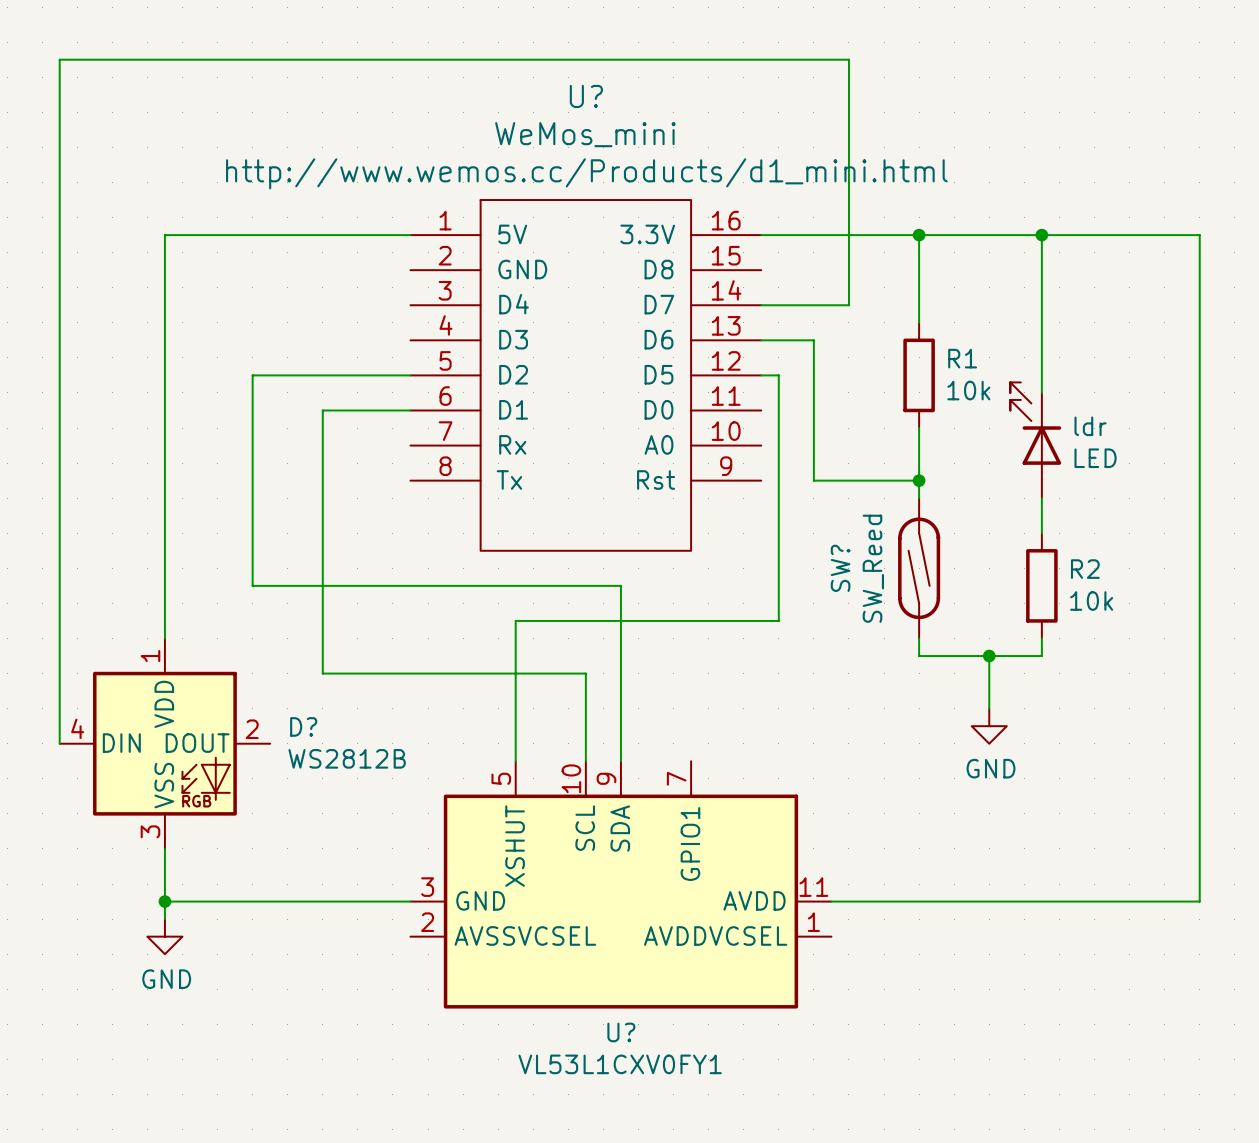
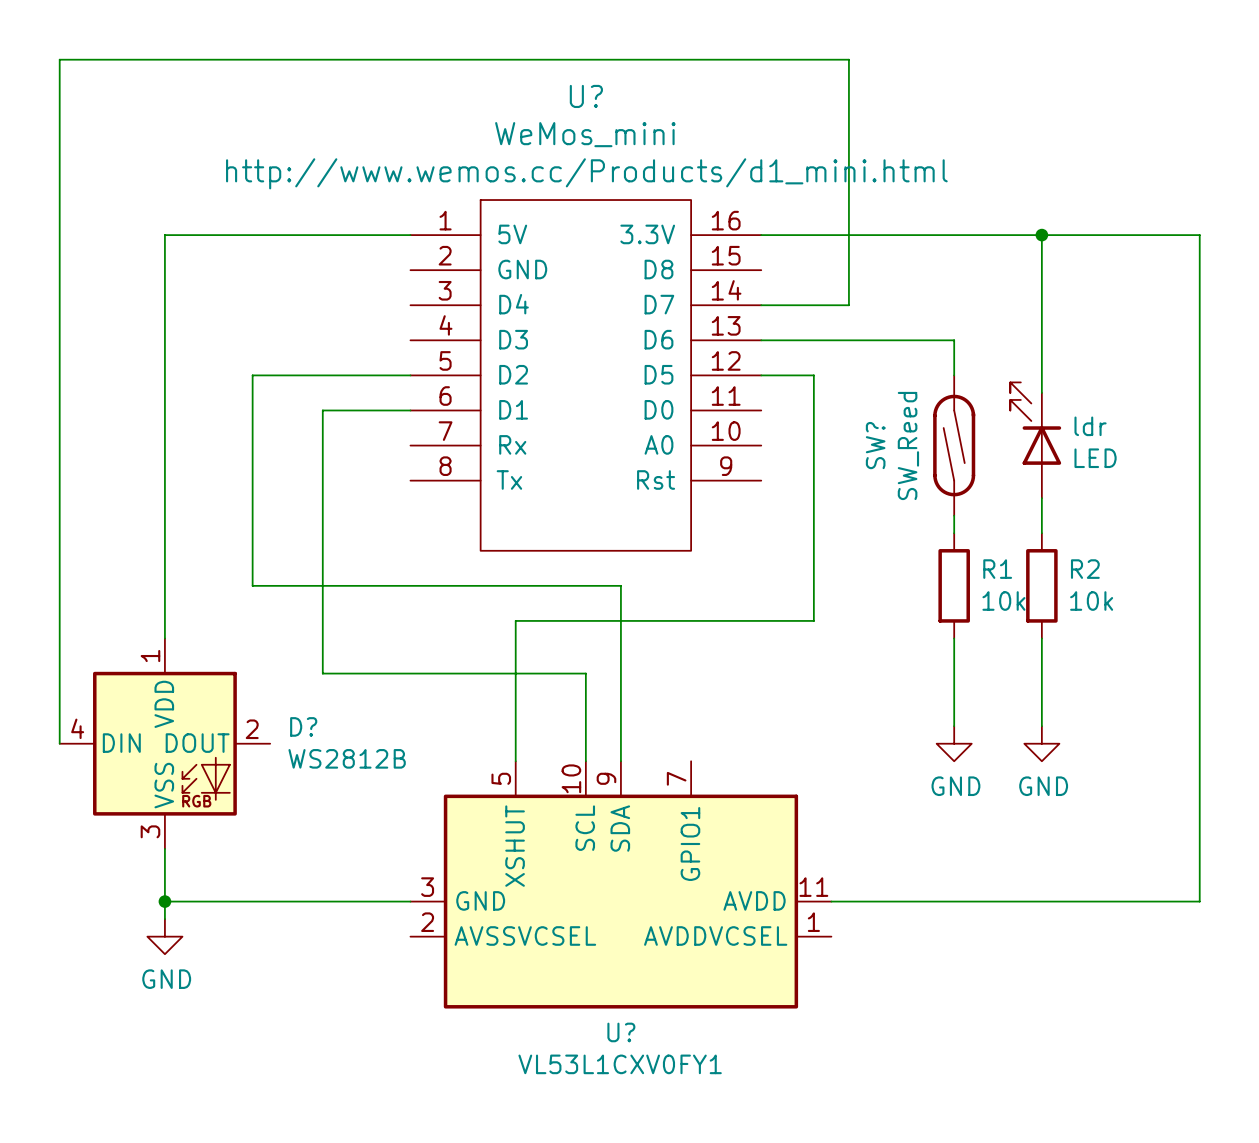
wire: (919, 235) (919, 322) -> none
junction: (919, 235) -> none
wire: (813, 340) (813, 375) -> (778, 375) (813, 375)
wire: none -> (813, 340) (954, 340) (954, 375)
wire: (778, 375) (778, 620) -> (813, 480) (813, 620) (778, 620)
R1 position: (919, 375) -> (954, 585)
wire: (919, 428) (919, 498) -> none
wire: (813, 480) (919, 480) -> none
junction: (919, 480) -> none
wire: none -> (954, 515) (954, 533)
SW? position: (919, 568) -> (954, 445)
wire: (919, 638) (919, 656) (1041, 656) -> (1041, 726) (1041, 656)
wire: none -> (954, 638) (954, 726)
wire: (989, 656) (989, 708) -> none
junction: (989, 656) -> none
power symbol: GND (989, 726) -> none
power symbol: none -> GND (954, 743)
power symbol: none -> GND (1041, 743)

